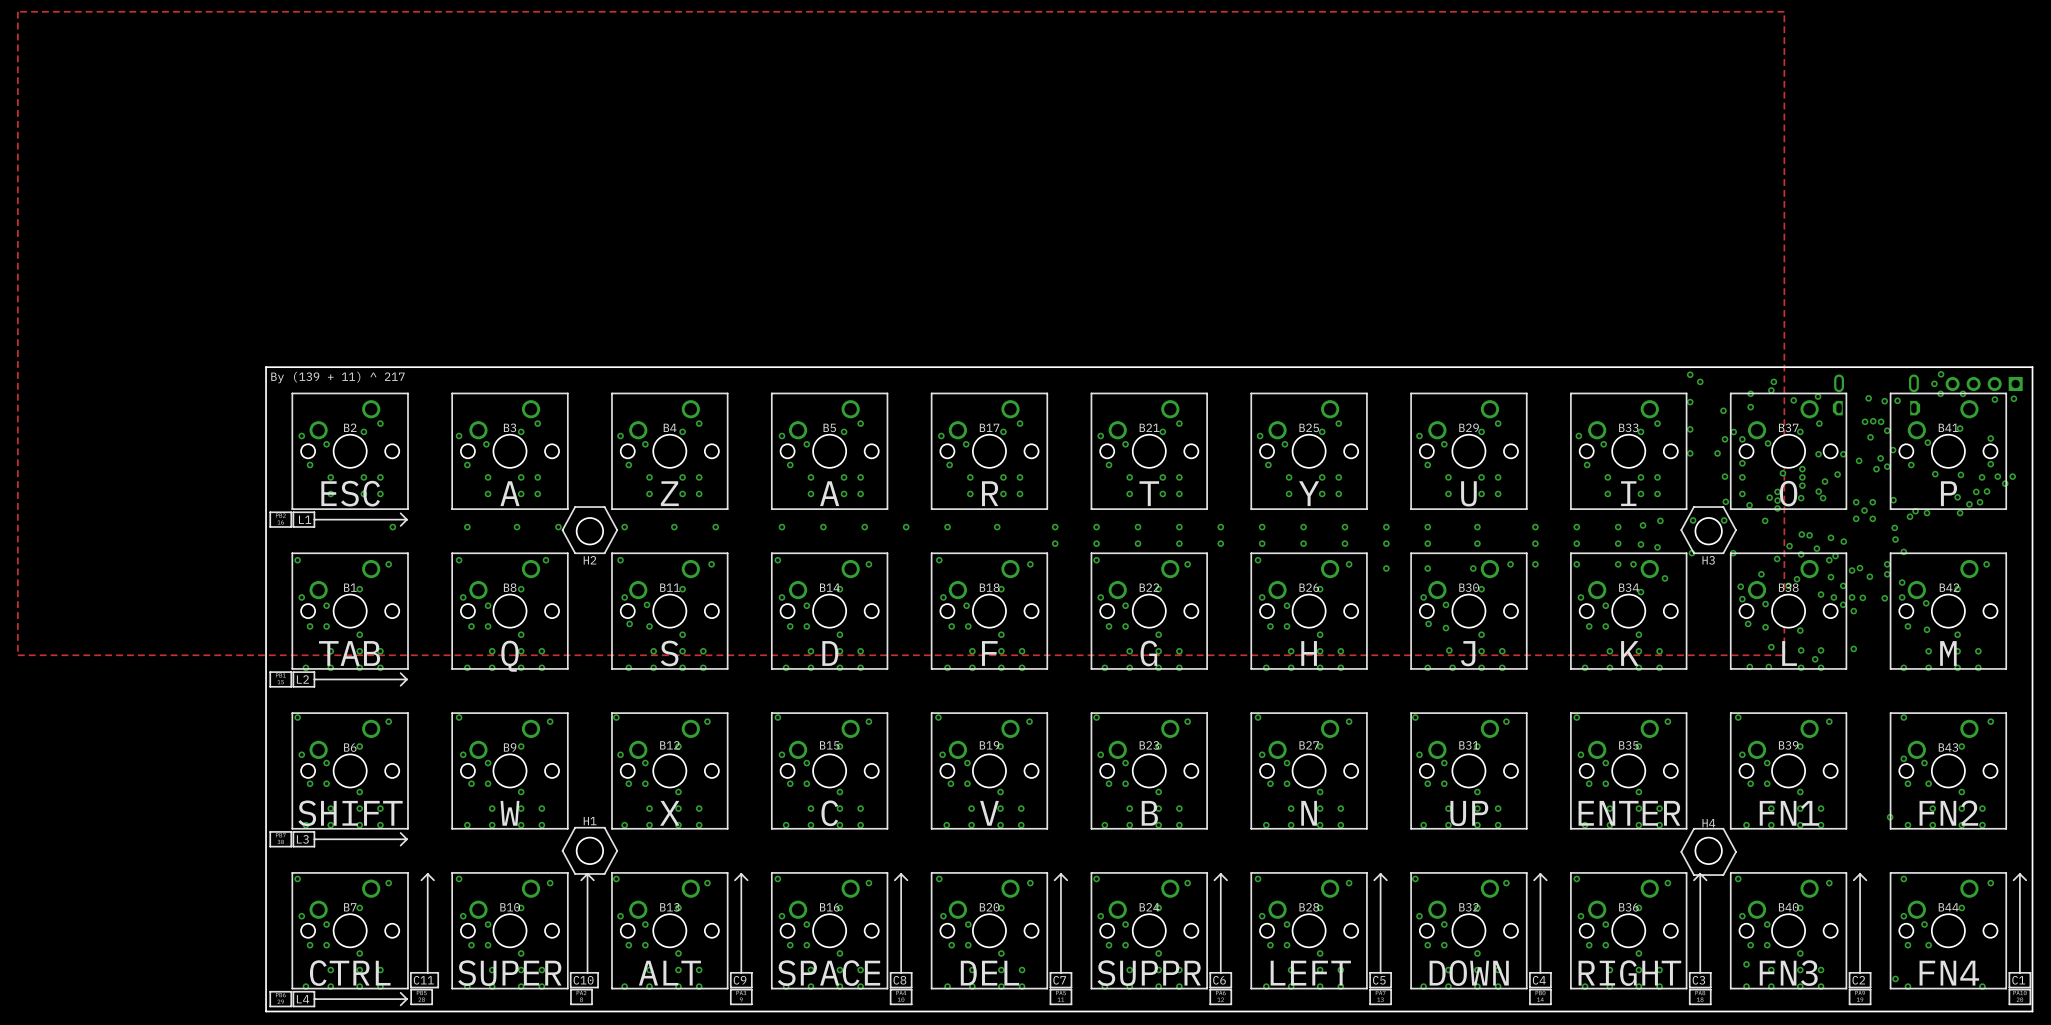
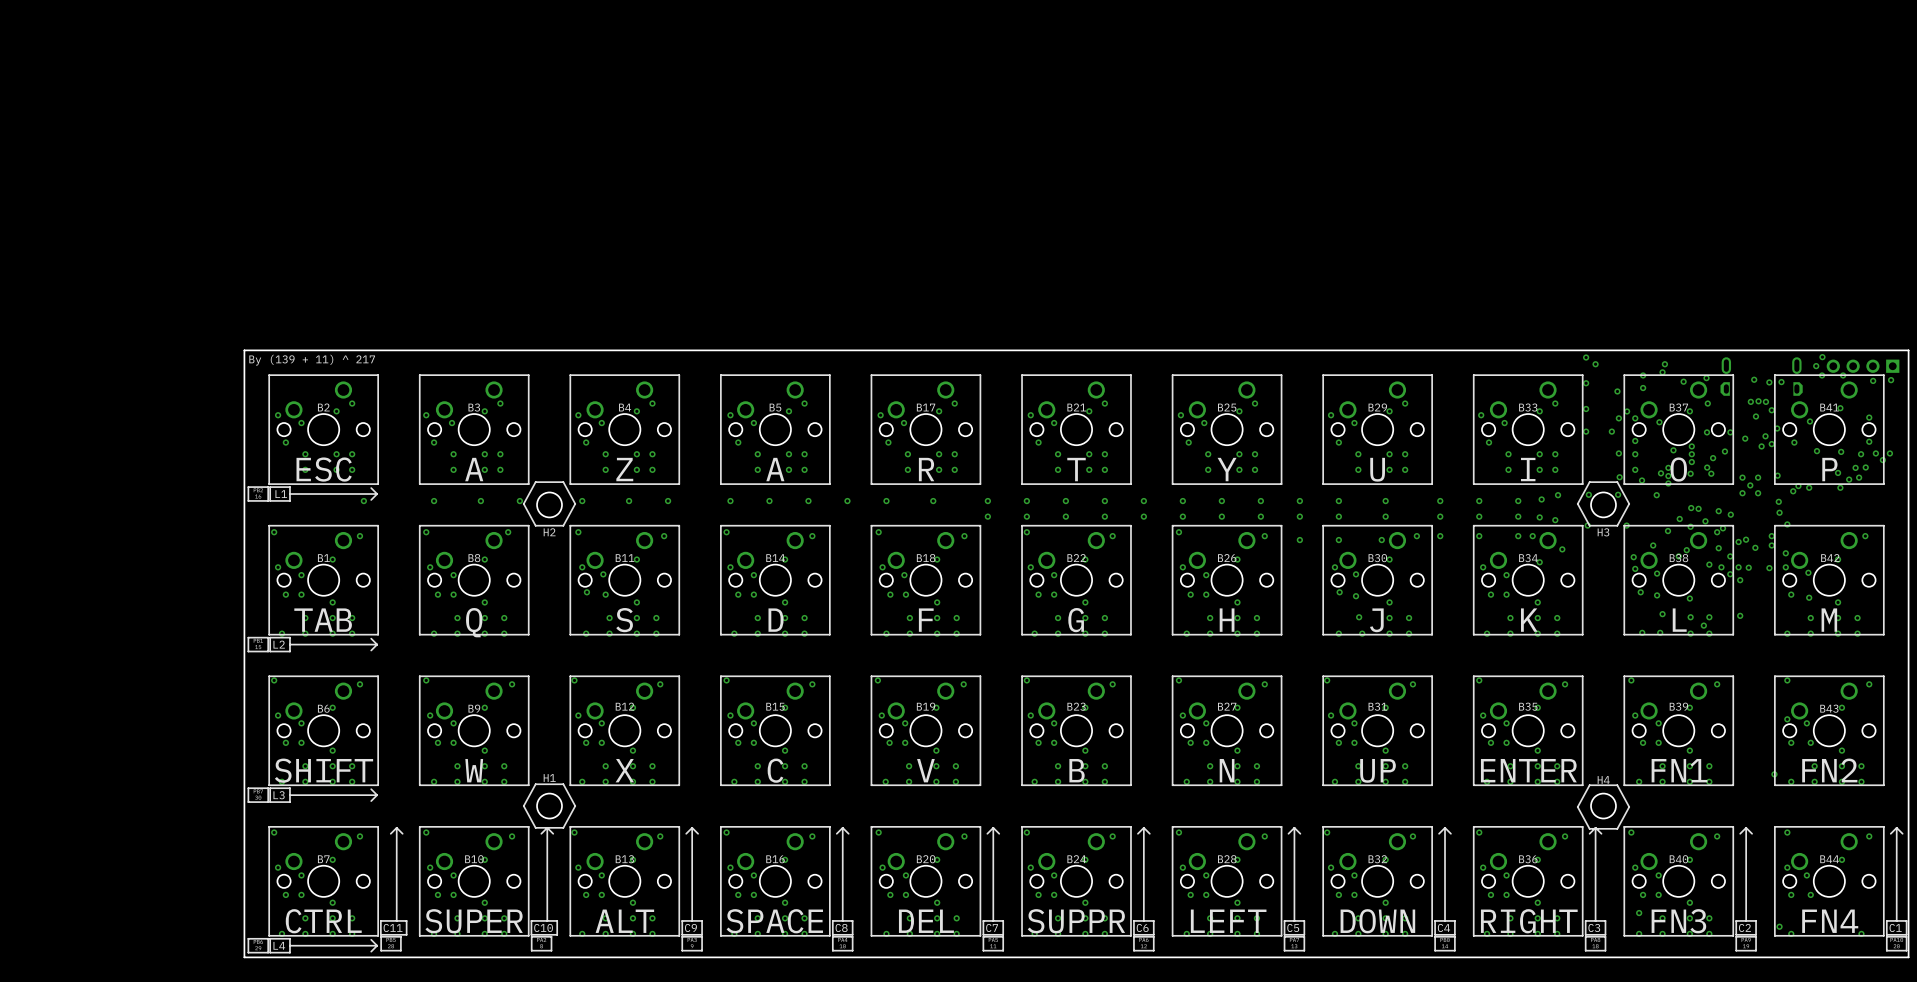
zone outline: (17, 11) (1784, 11) (1784, 655) (17, 655) (17, 11) -> none

